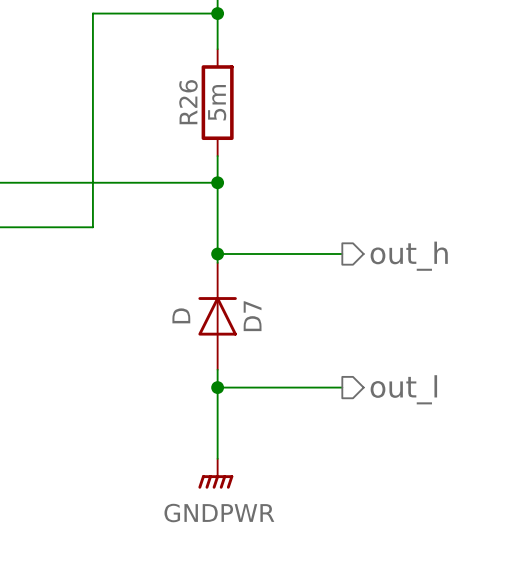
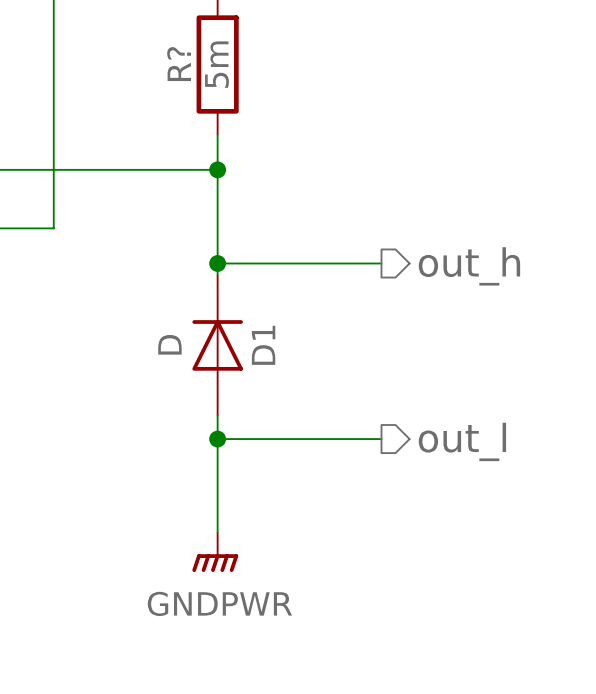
R26 name: R26 (188, 102) -> R? (179, 64)
D7 name: D7 (252, 316) -> D1 (263, 345)

